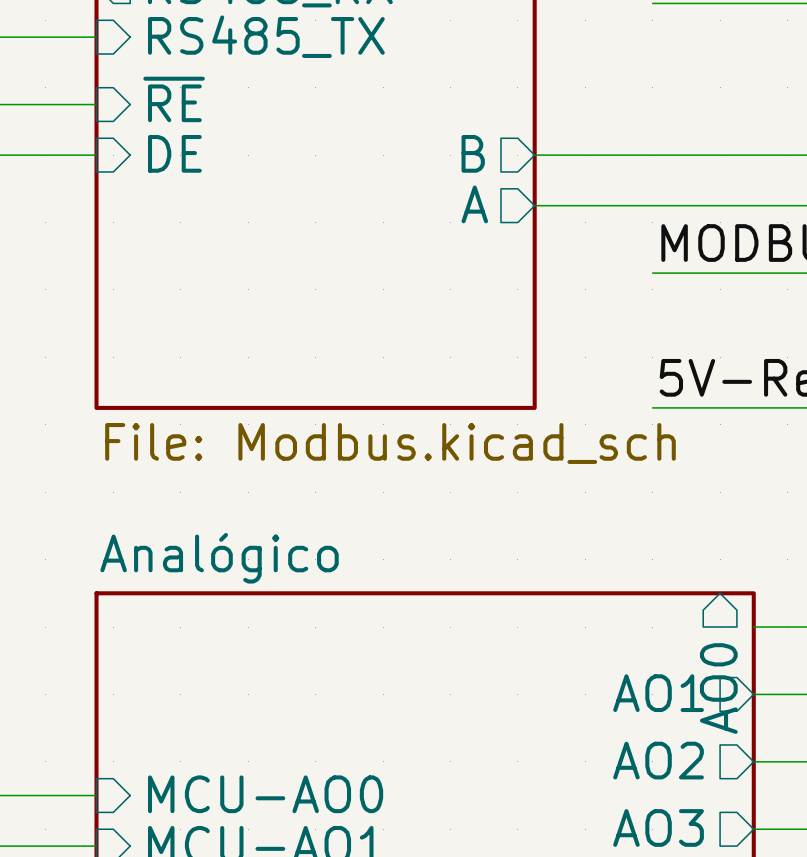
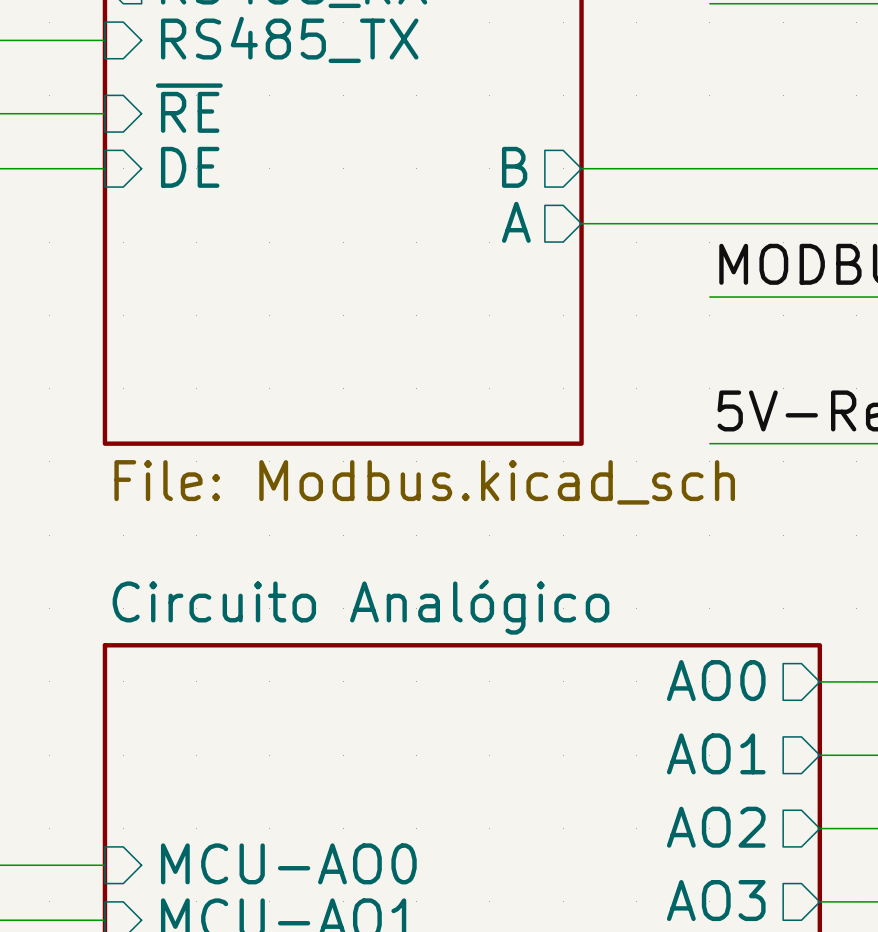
sheet Analógico name: Analógico (219, 558) -> Circuito Analógico (360, 607)
sheet pin rotation: 0° (718, 688) -> 90° clockwise (716, 680)

